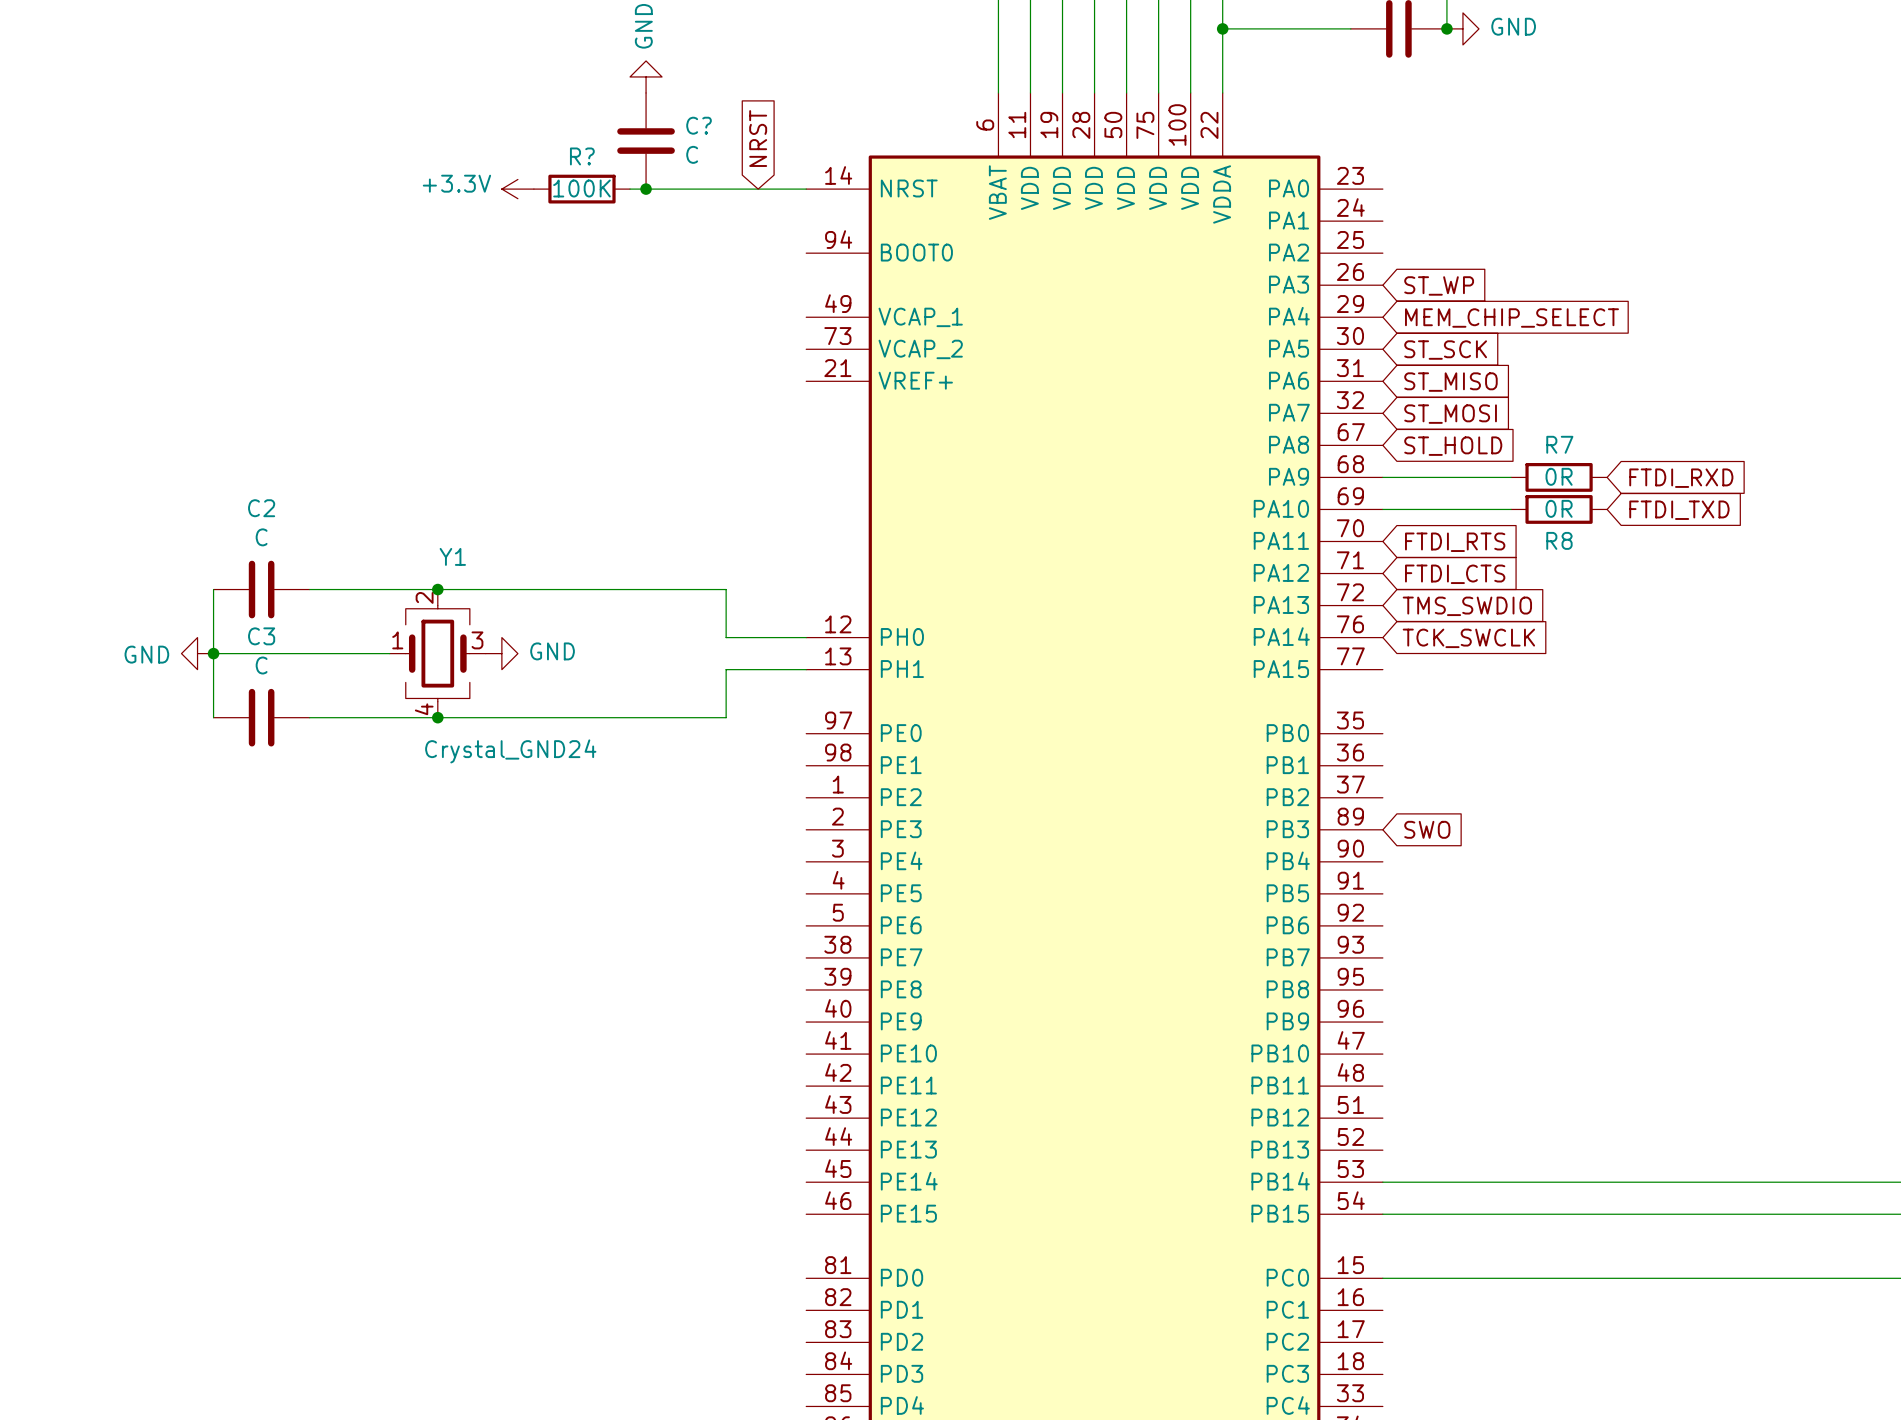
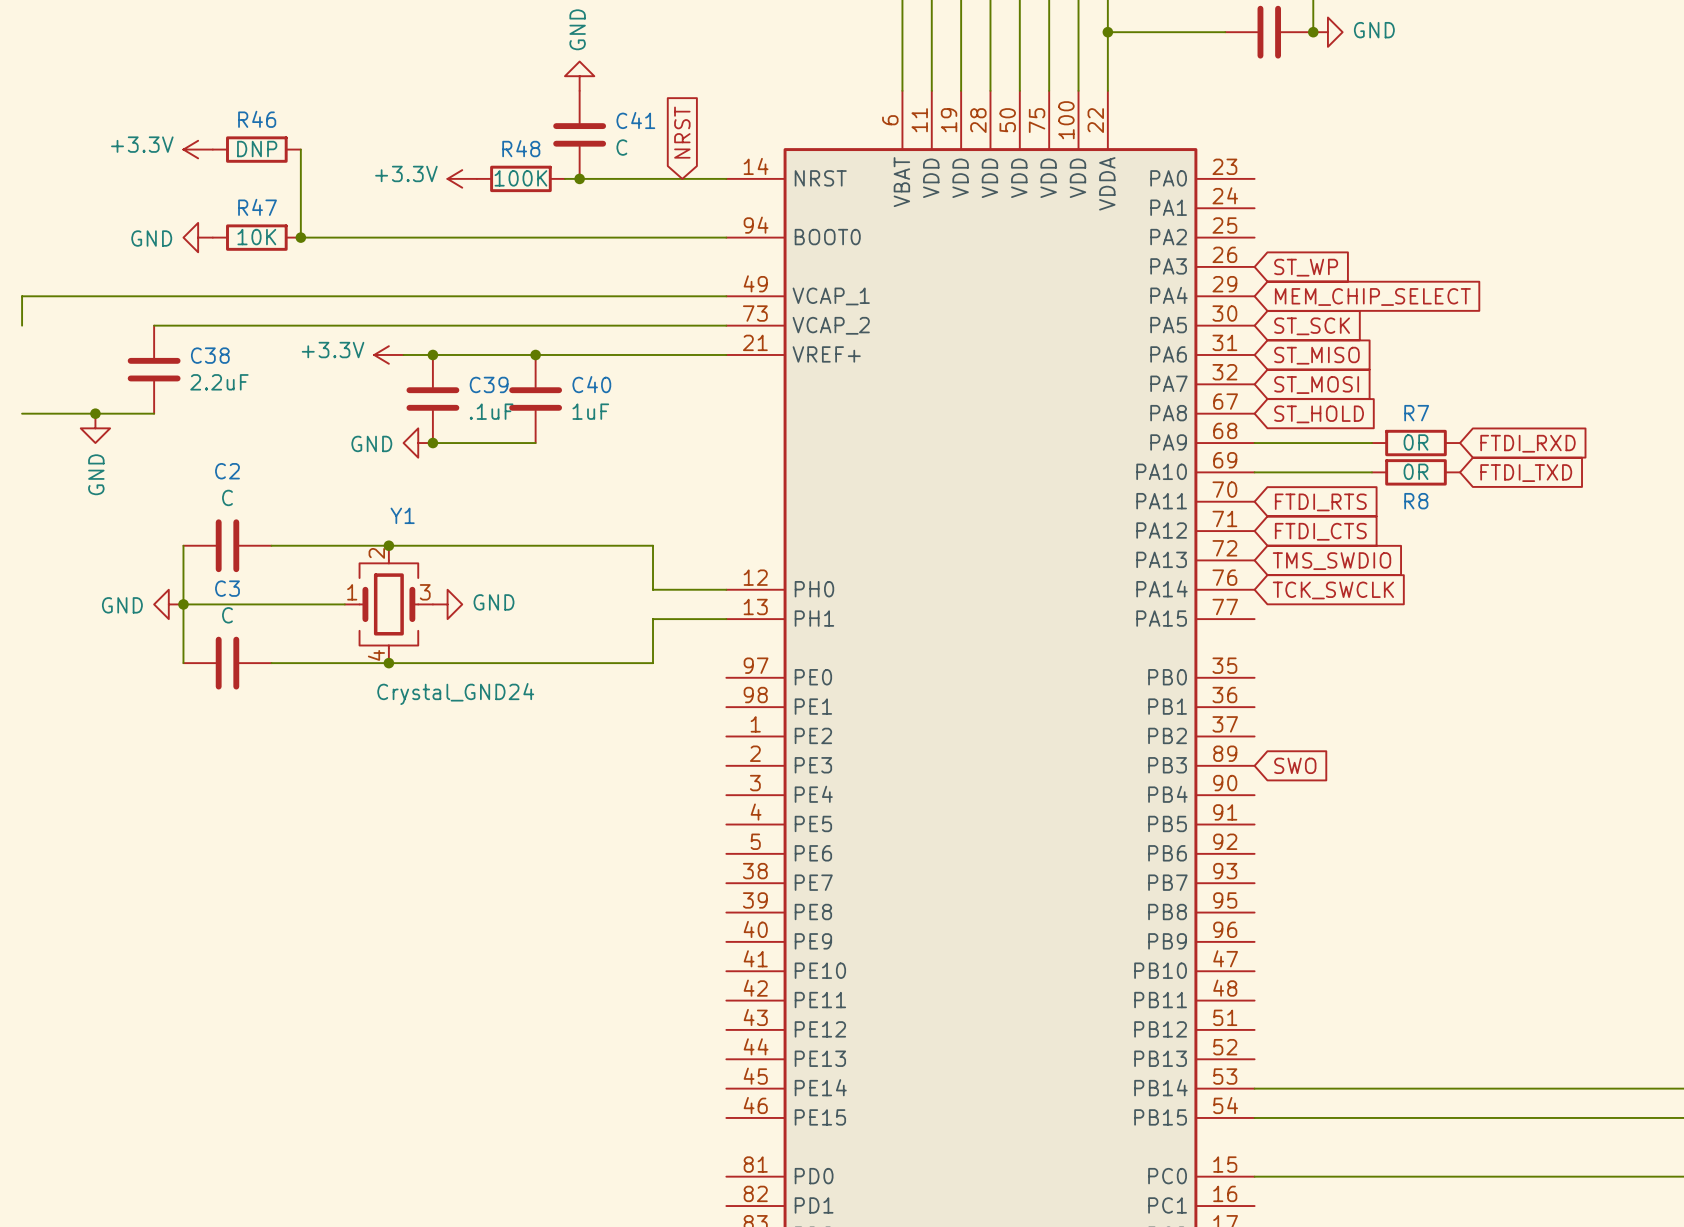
C? name: C? (699, 125) -> C41 (635, 120)
R? name: R? (582, 156) -> R48 (521, 148)
power symbol: none -> +3.3V (198, 149)
R46: none -> DNP (256, 149)
wire: none -> (300, 149) (300, 237) (726, 237)
power symbol: none -> GND (198, 237)
R47: none -> 10K (256, 237)
junction: none -> (300, 237)
wire: none -> (726, 296) (22, 296) (22, 325)
wire: none -> (154, 325) (726, 325)
power symbol: none -> +3.3V (388, 354)
wire: none -> (403, 354) (726, 354)
junction: none -> (432, 354)
junction: none -> (535, 354)
C38: none -> 2.2uF (154, 369)
C39: none -> .1uF (432, 399)
C40: none -> 1uF (535, 399)
wire: none -> (22, 413) (154, 413)
junction: none -> (95, 413)
power symbol: none -> GND (95, 428)
power symbol: none -> GND (418, 443)
wire: none -> (432, 443) (535, 443)
junction: none -> (432, 443)

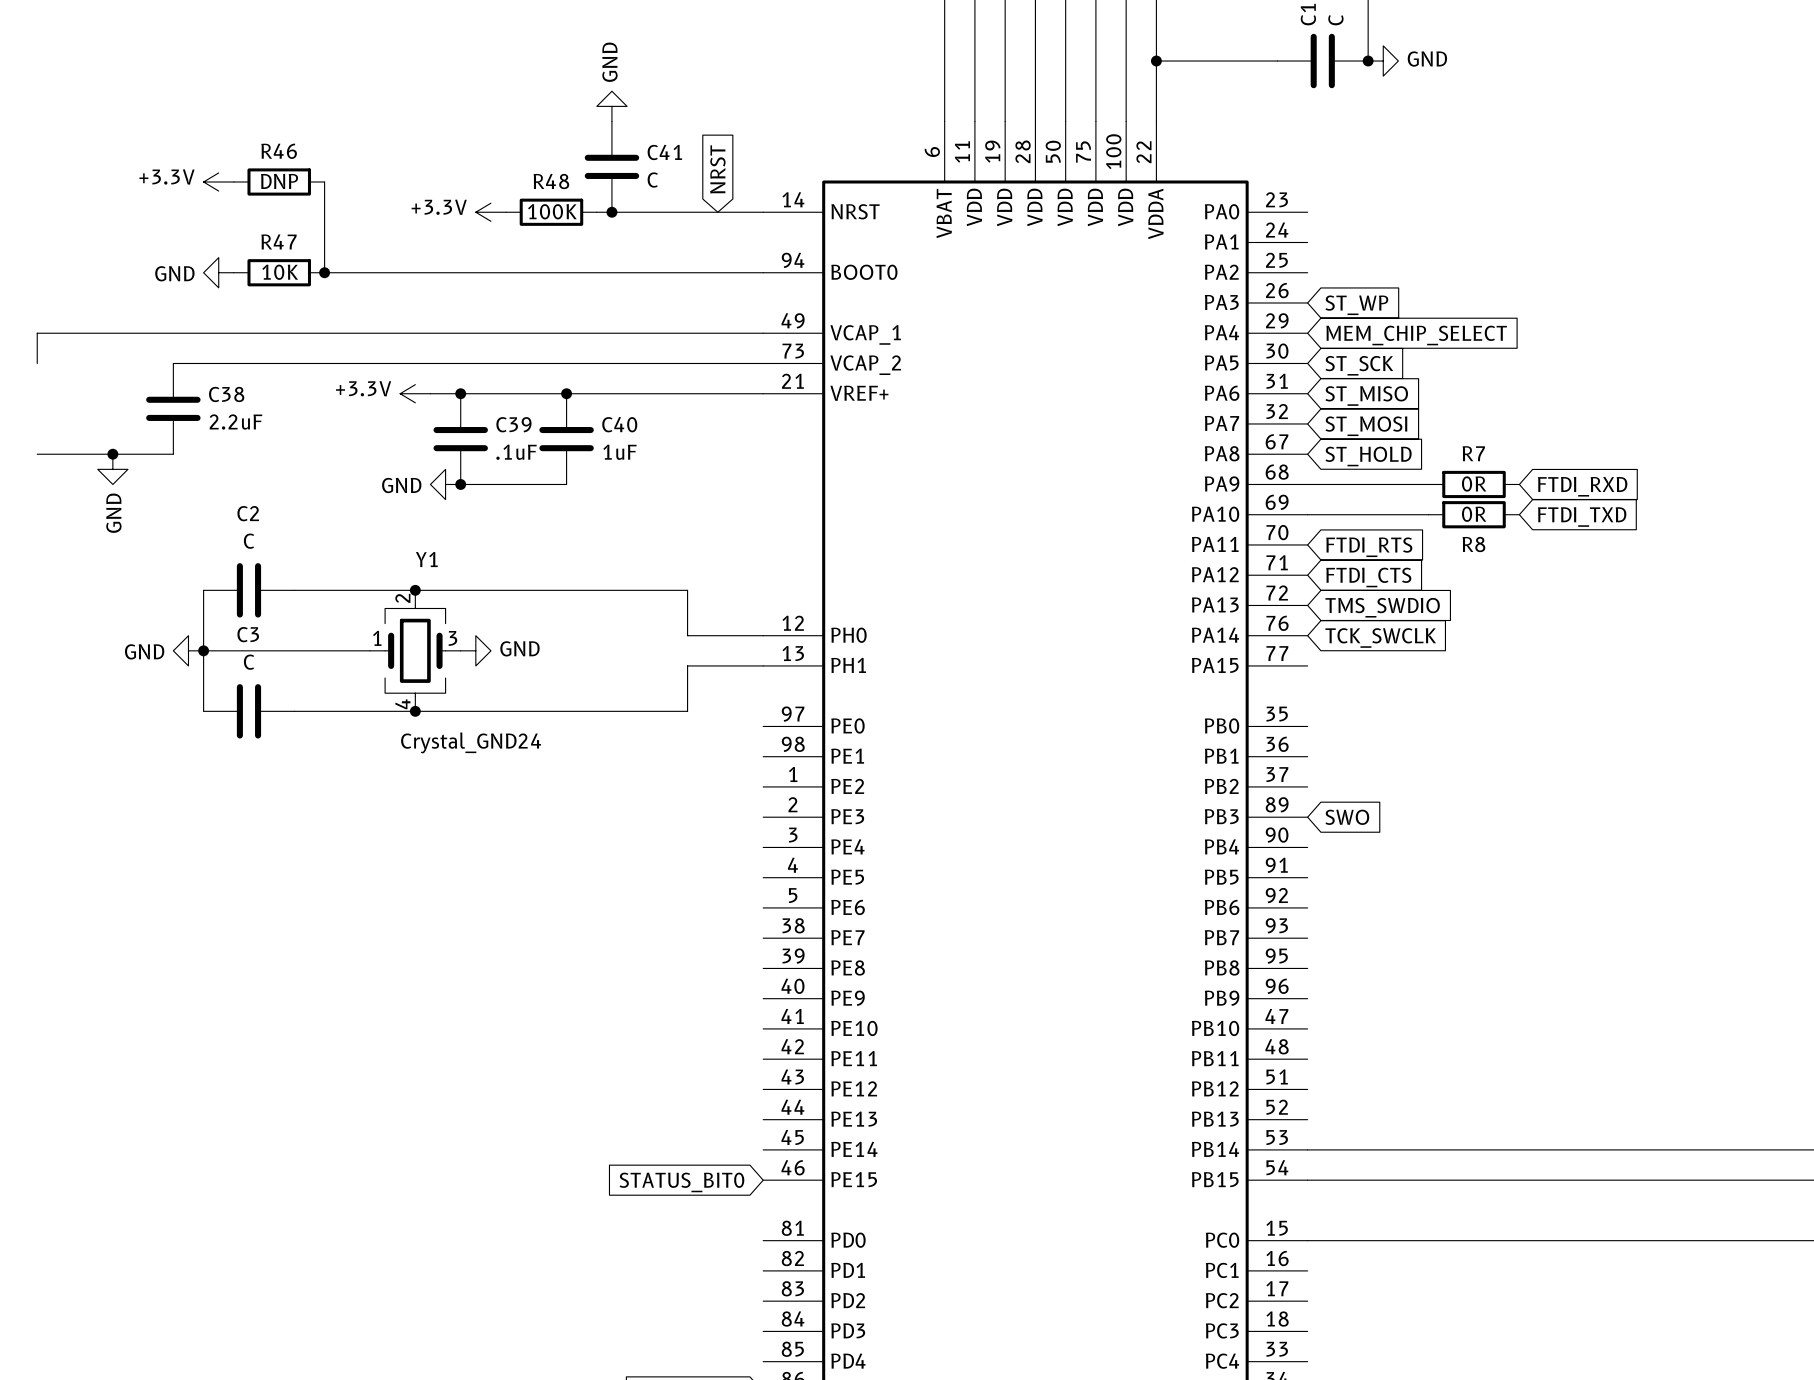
global label: none -> STATUS_BIT0 (681, 1182)

